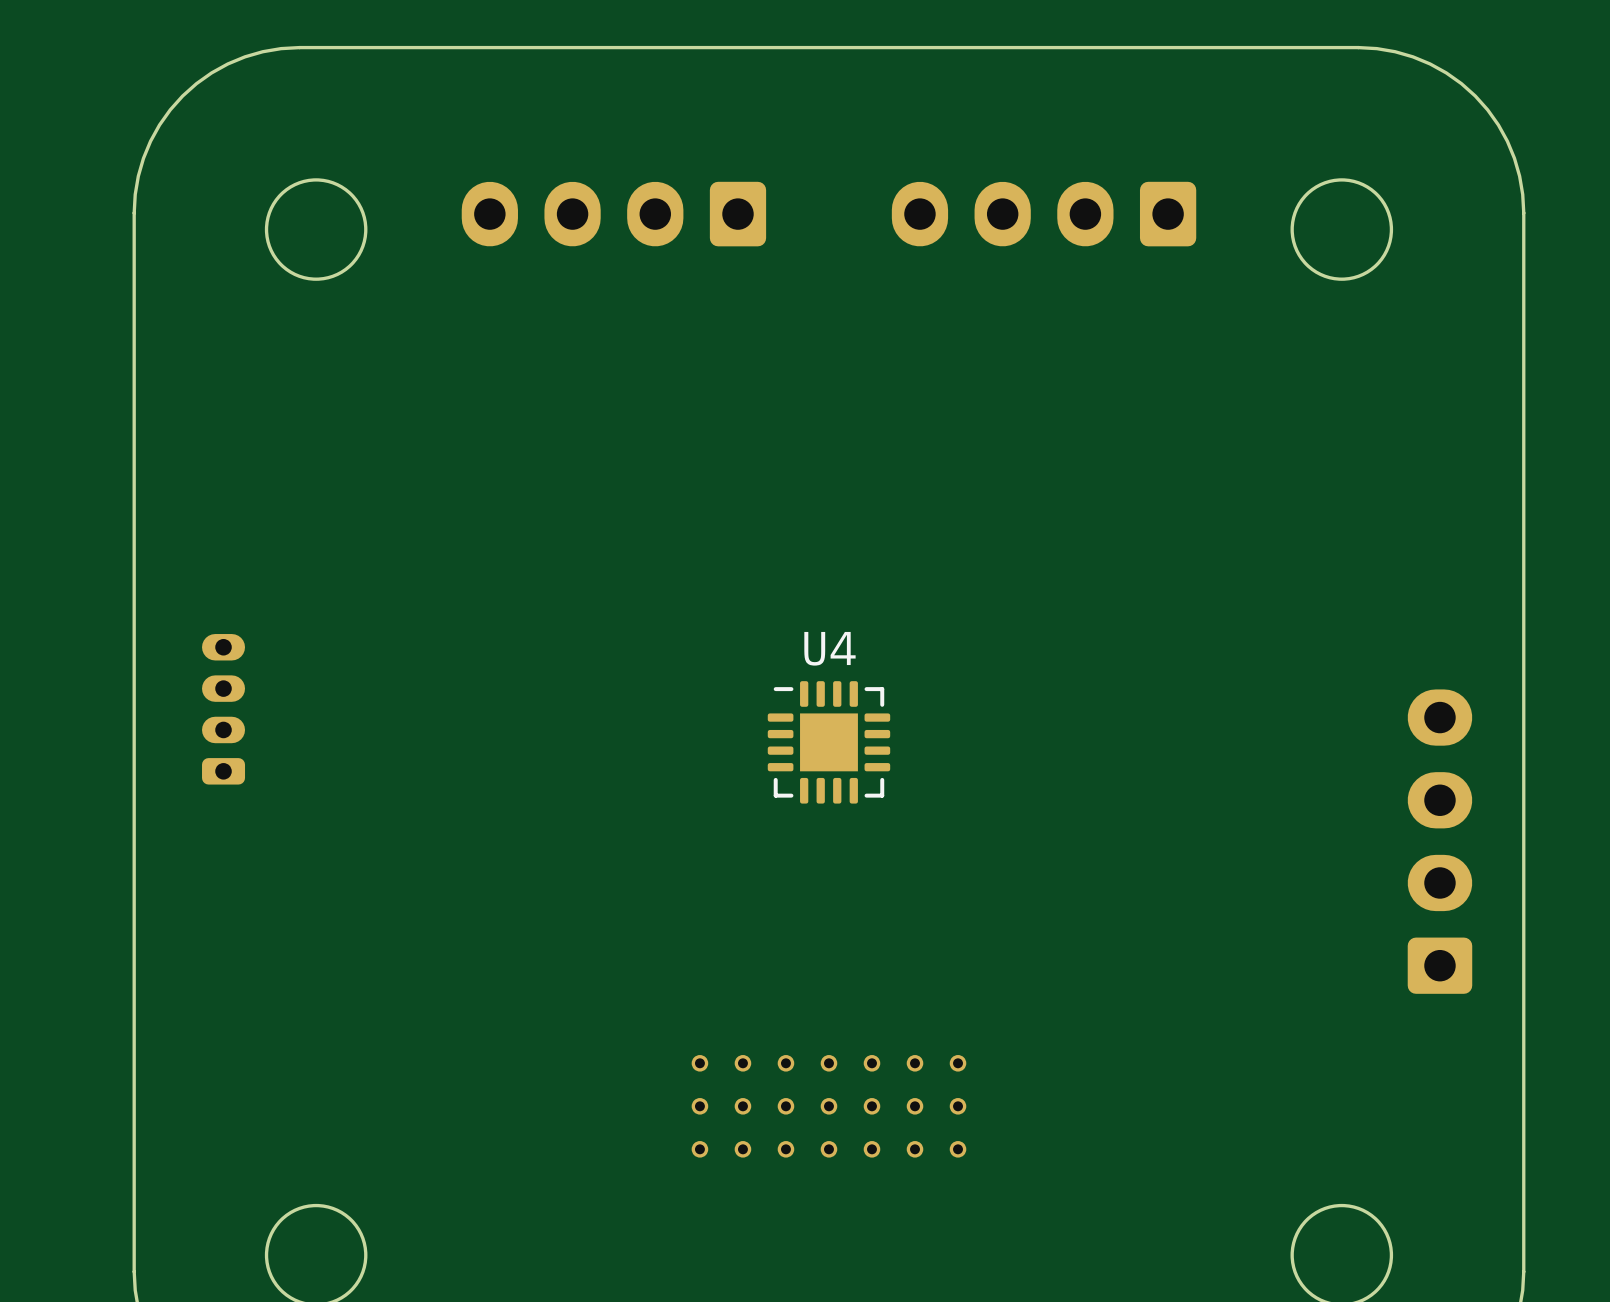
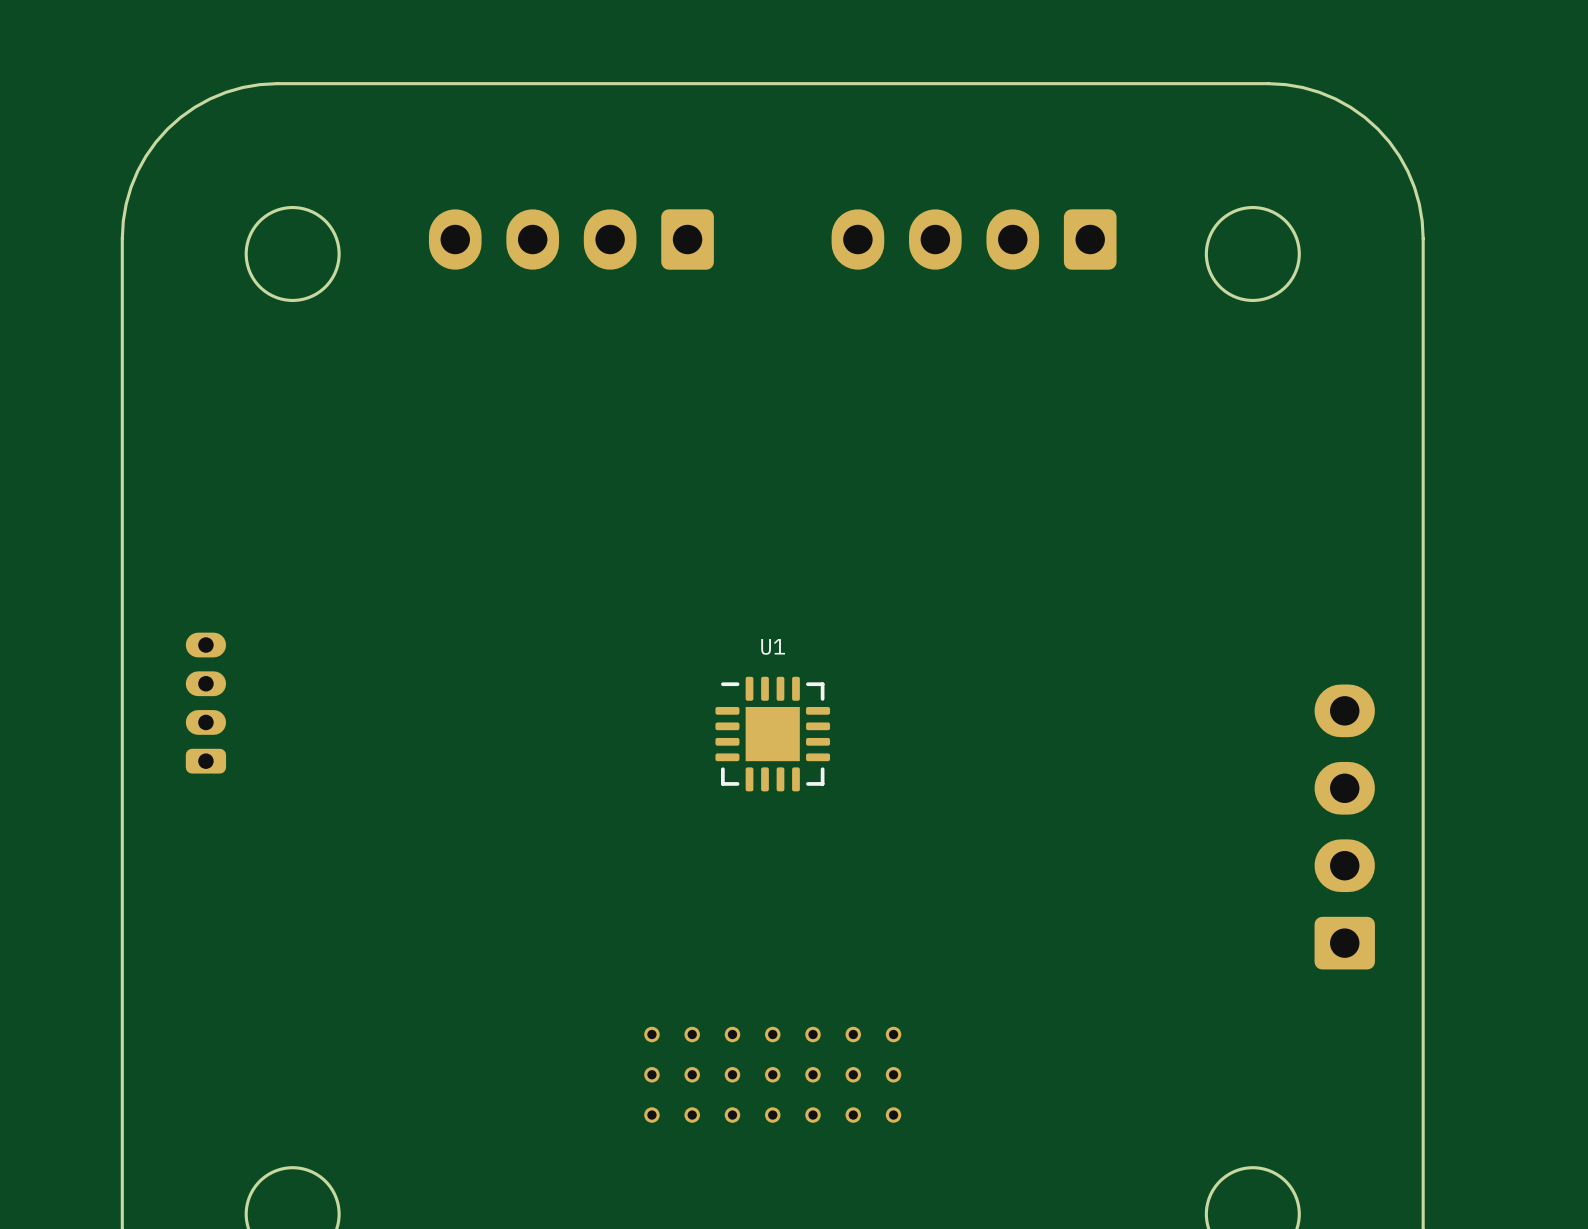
U4 name: U4 (829, 648) -> U1 (773, 646)

